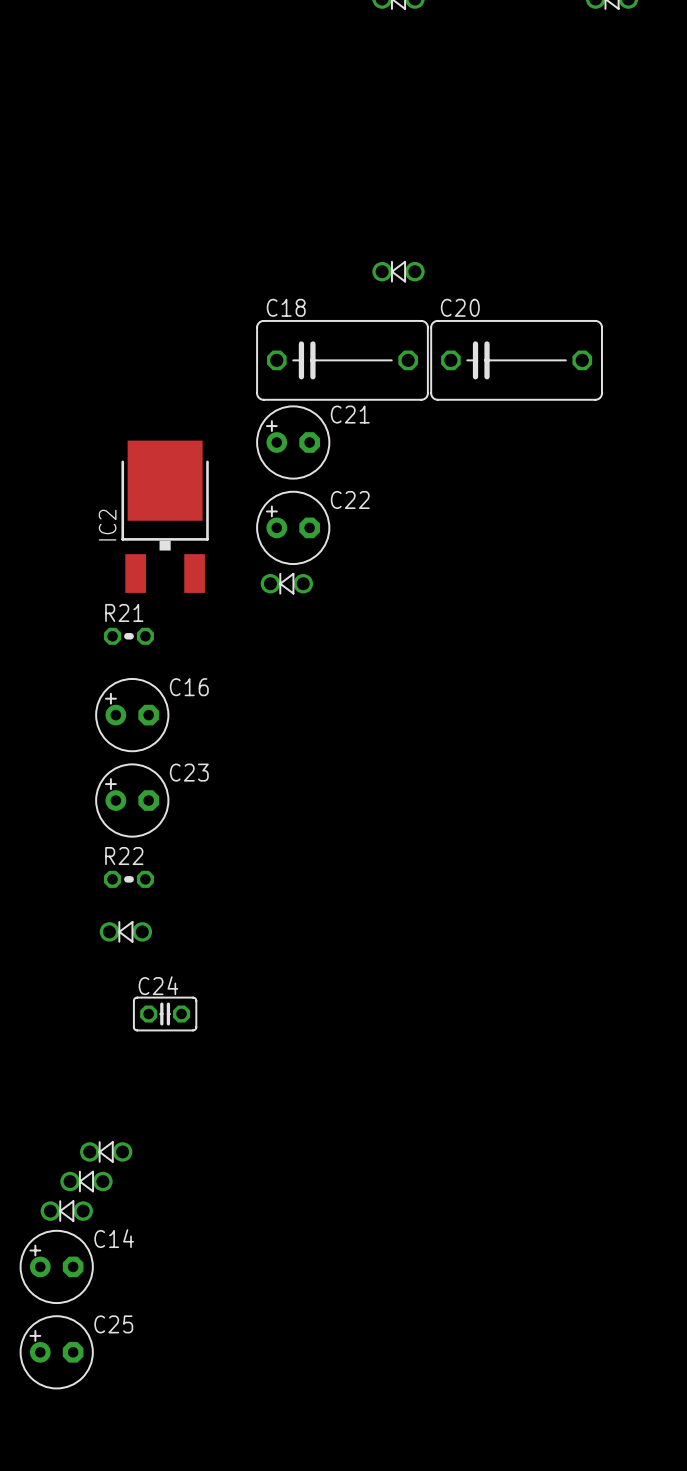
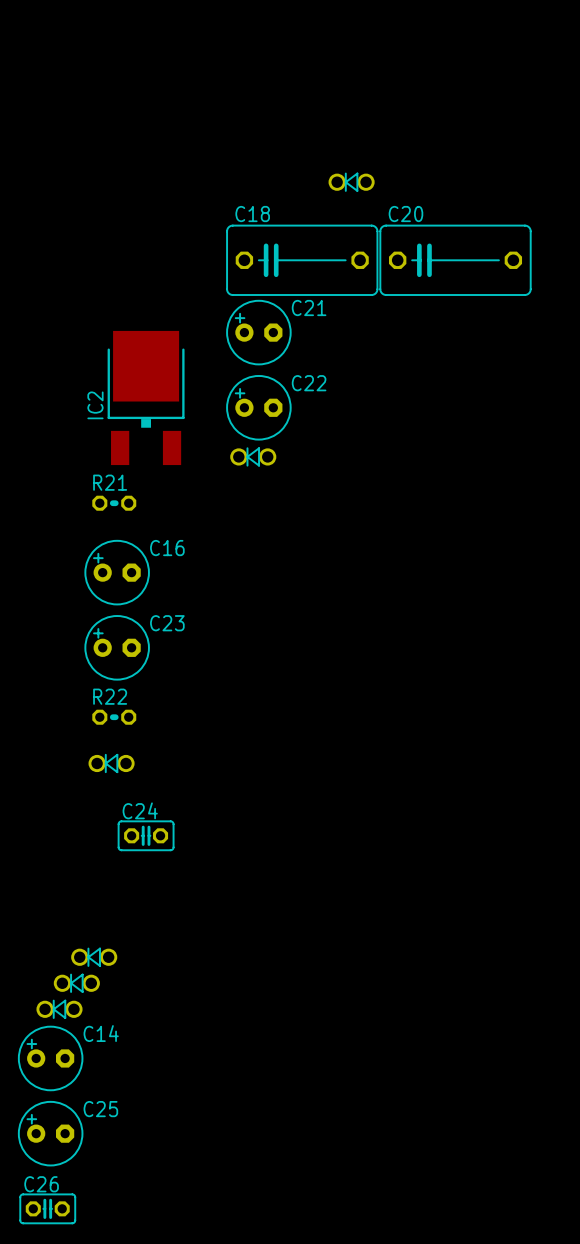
C26: none -> (47, 1208)

